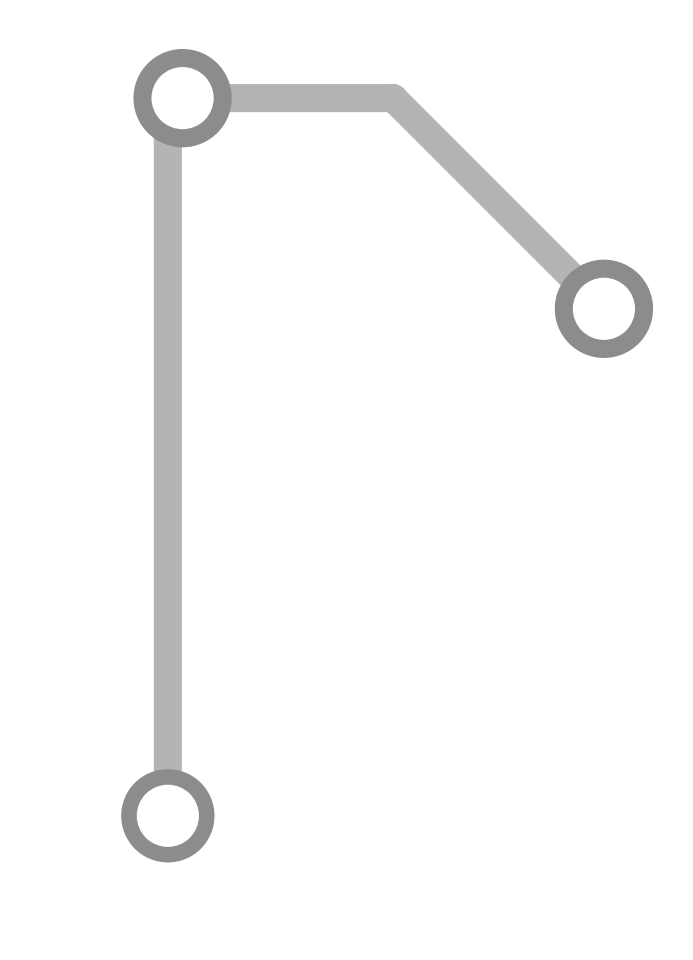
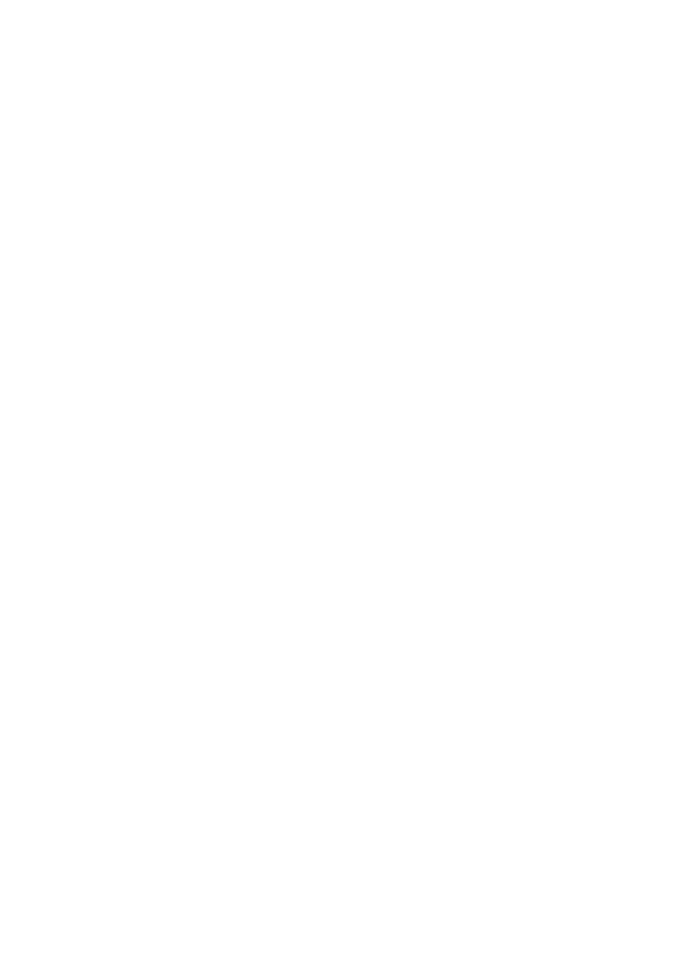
via: (182, 98) -> none
track: (603, 308) (393, 98) (182, 98) (167, 112) (167, 815) -> none
via: (603, 308) -> none
via: (167, 815) -> none

